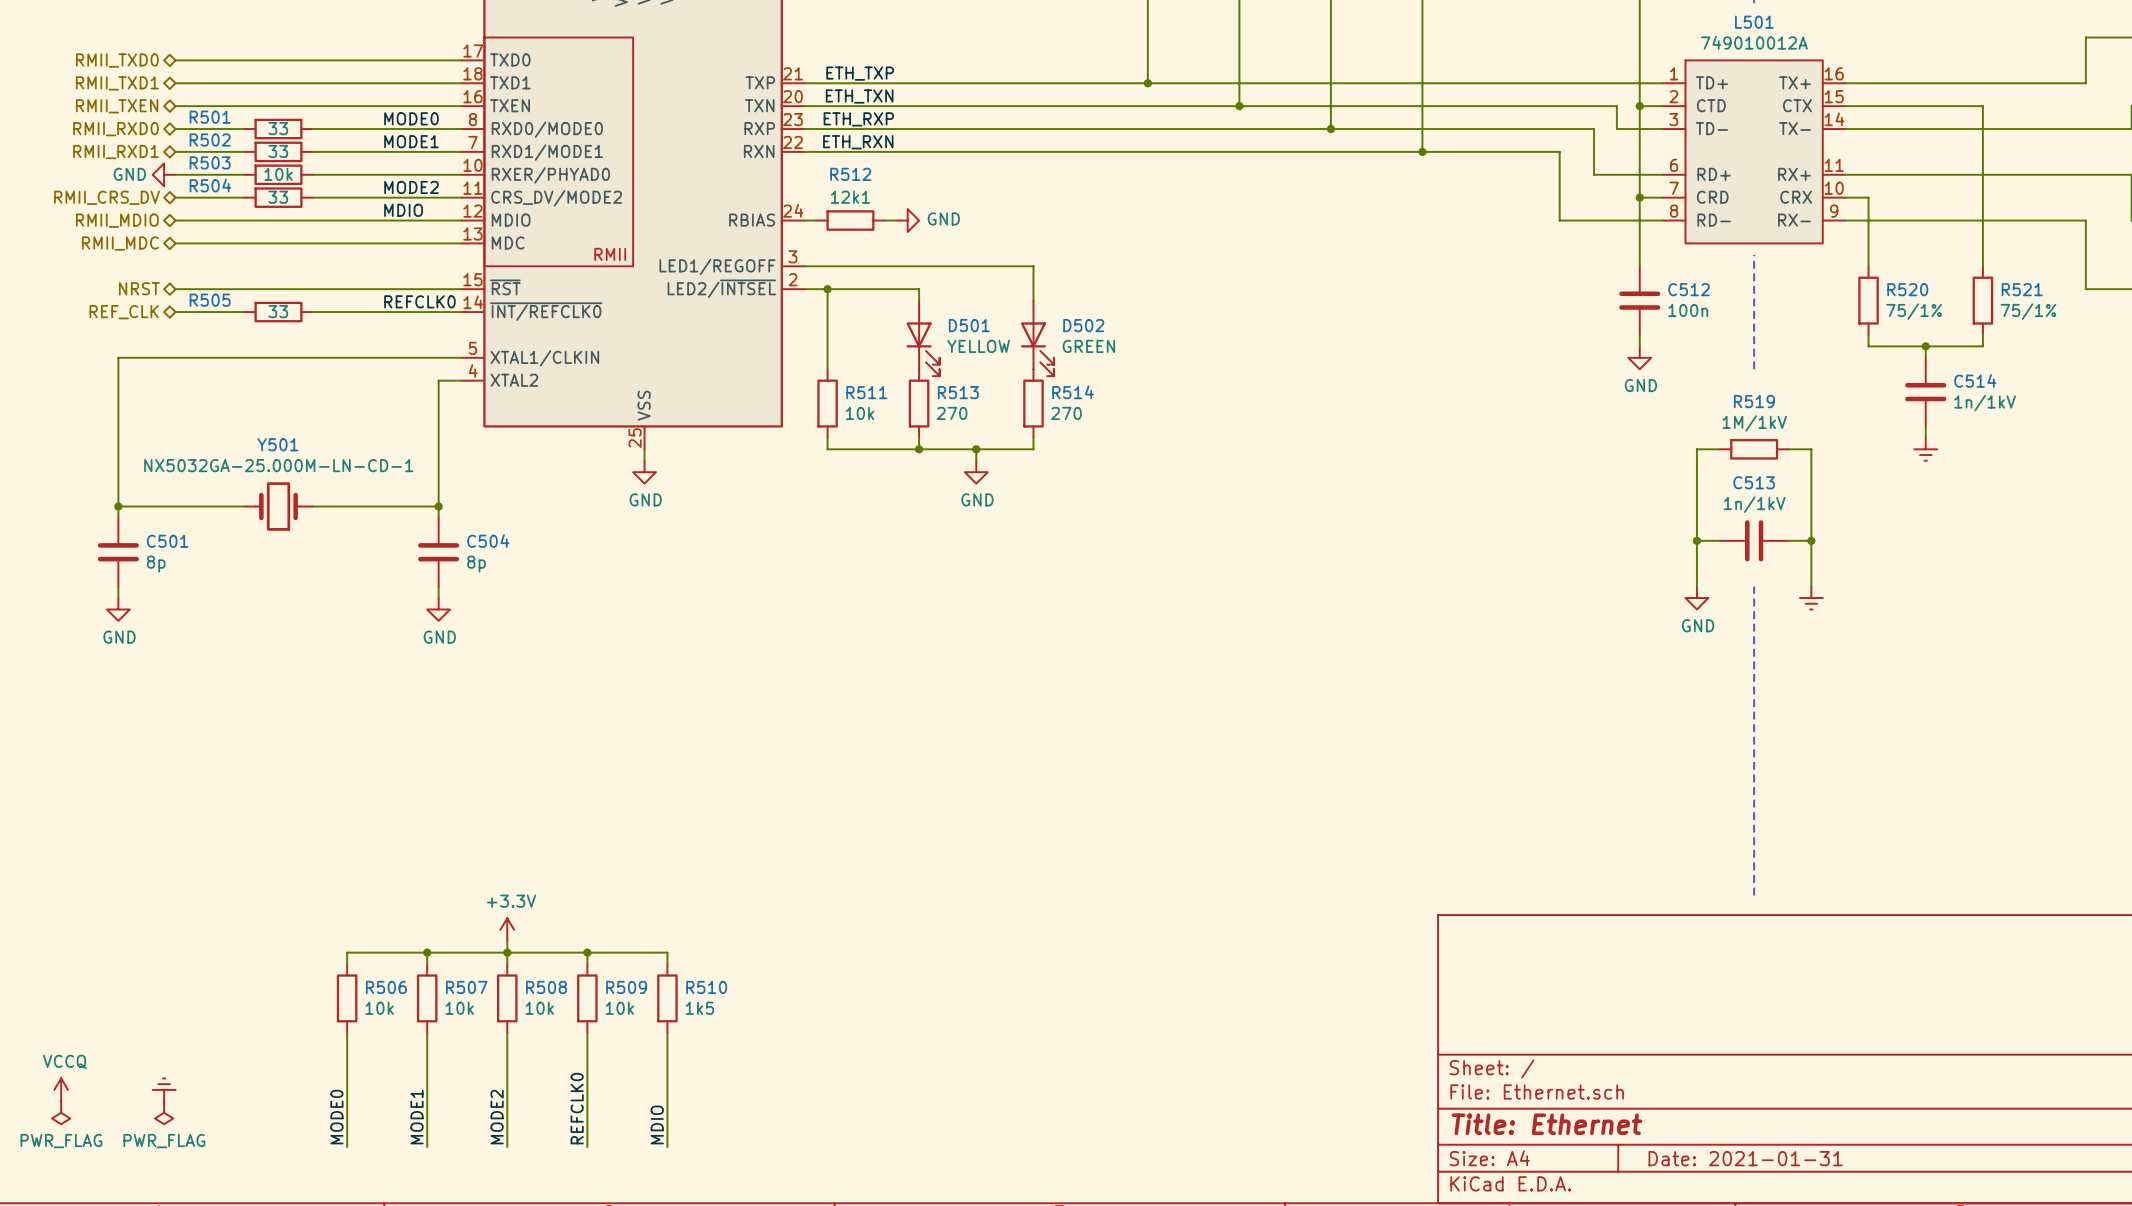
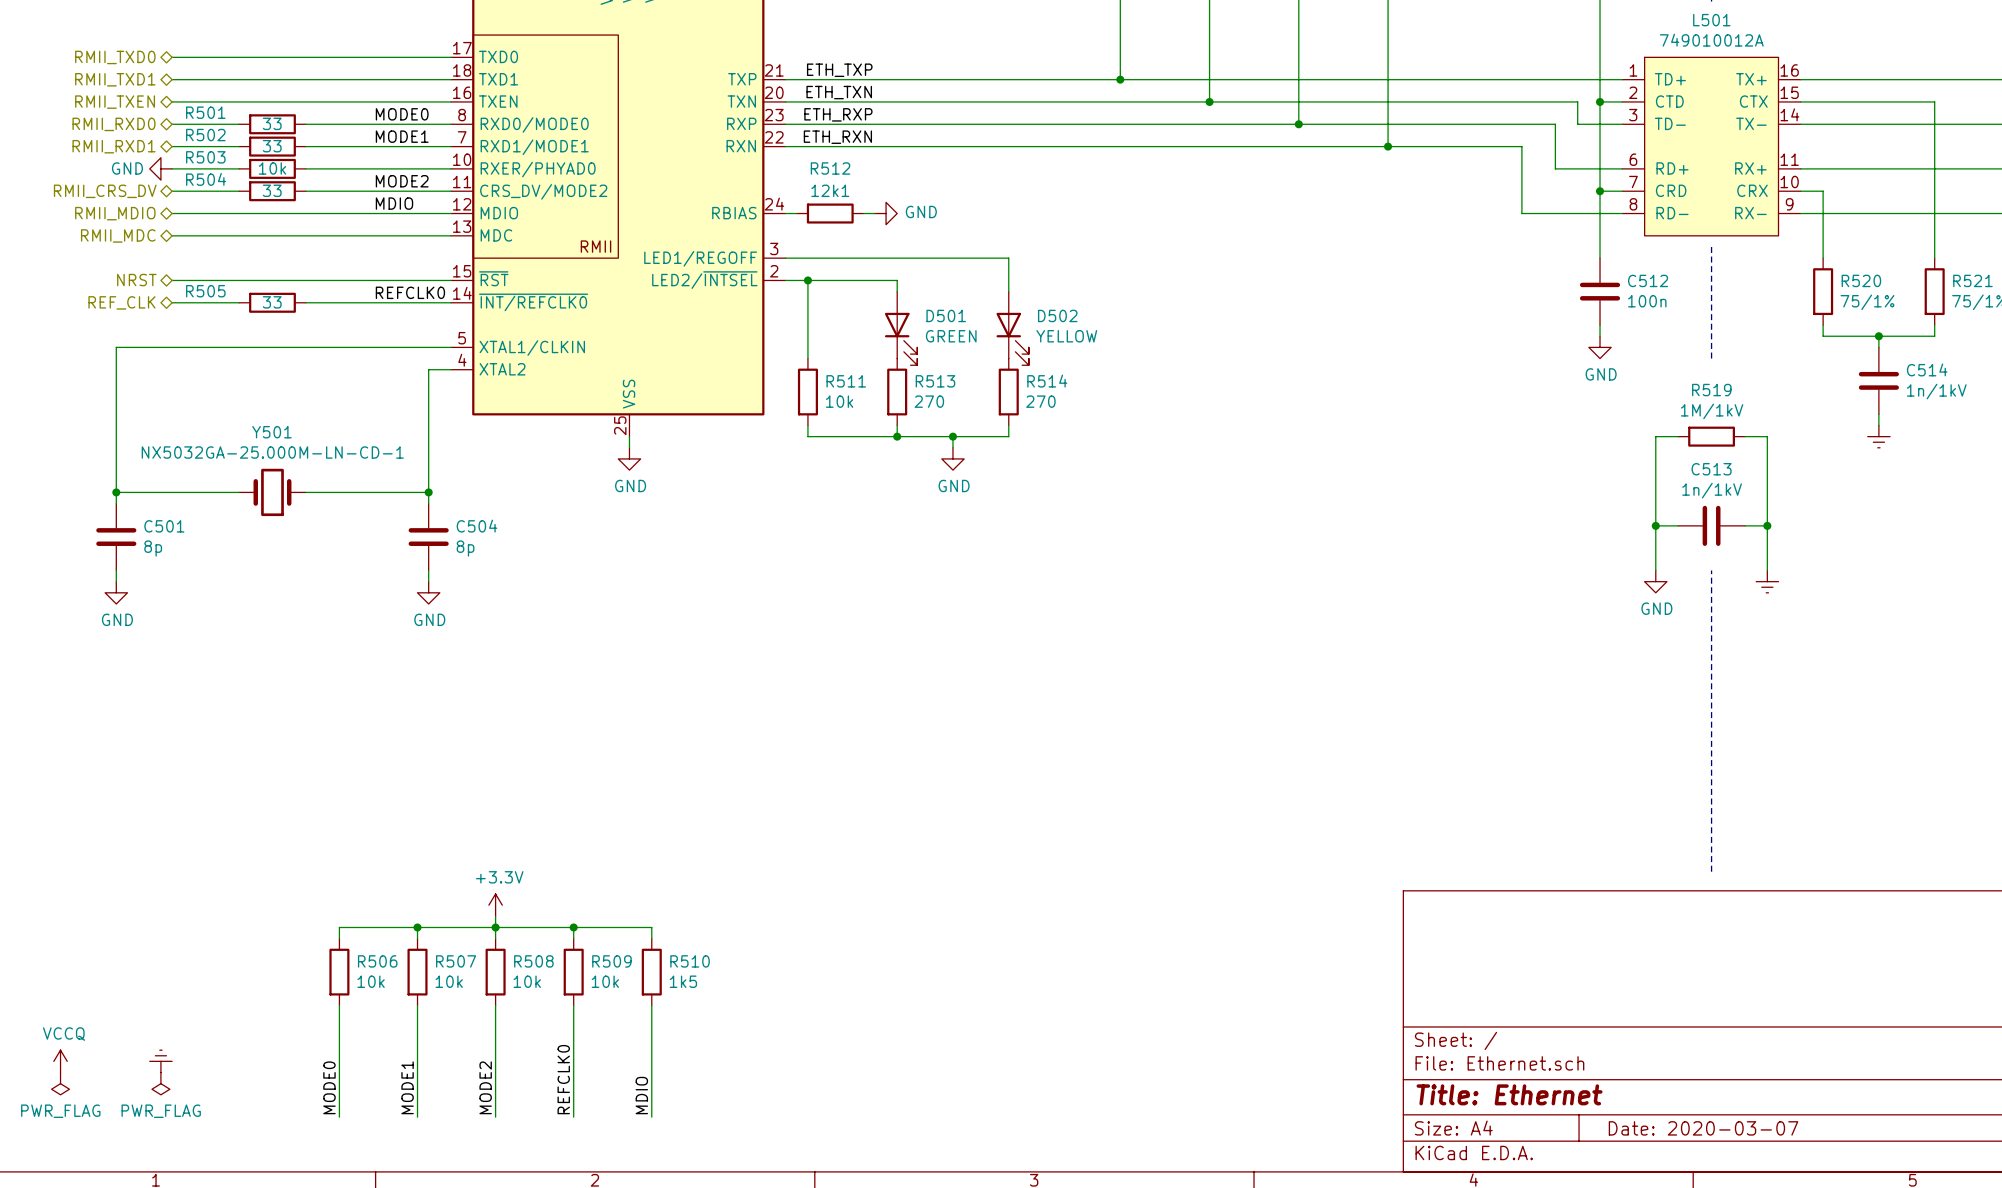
D501 value: YELLOW (978, 346) -> GREEN (951, 336)
D502 value: GREEN (1088, 346) -> YELLOW (1066, 336)
title block: Date: 2021-01-31 (1745, 1158) -> Date: 2020-03-07 (1703, 1128)

